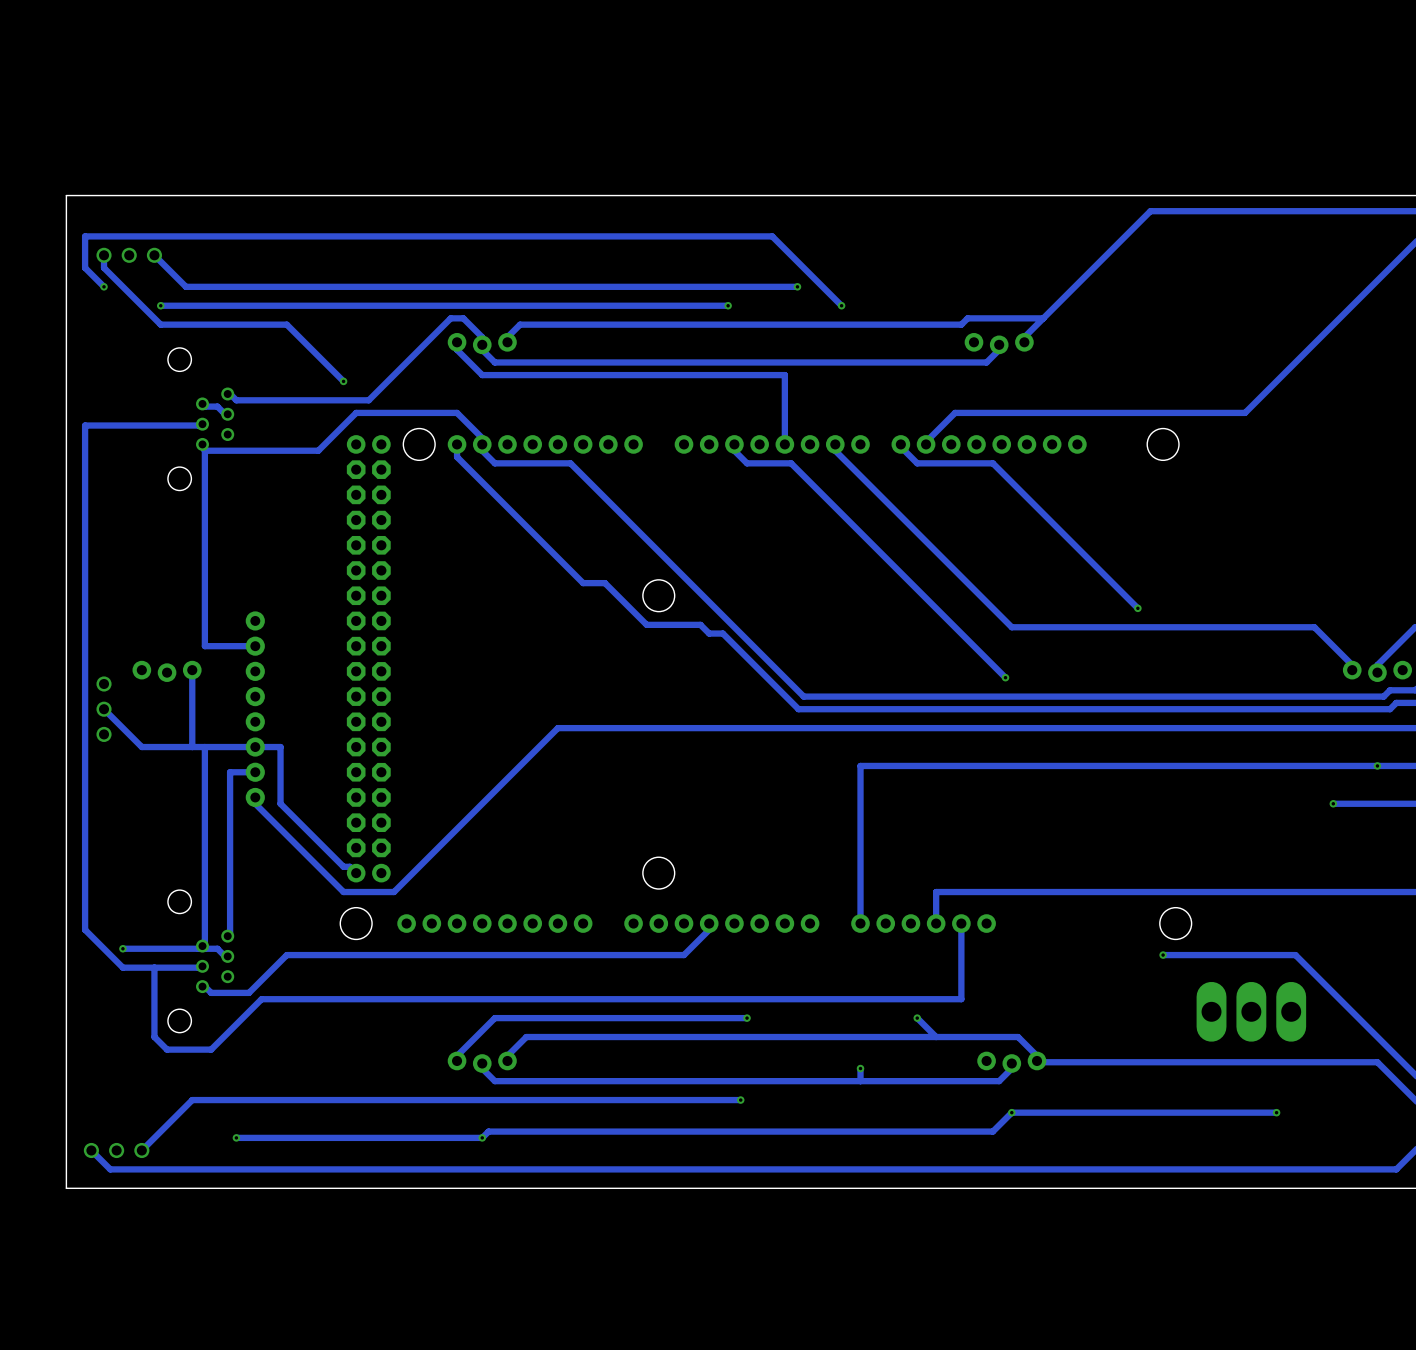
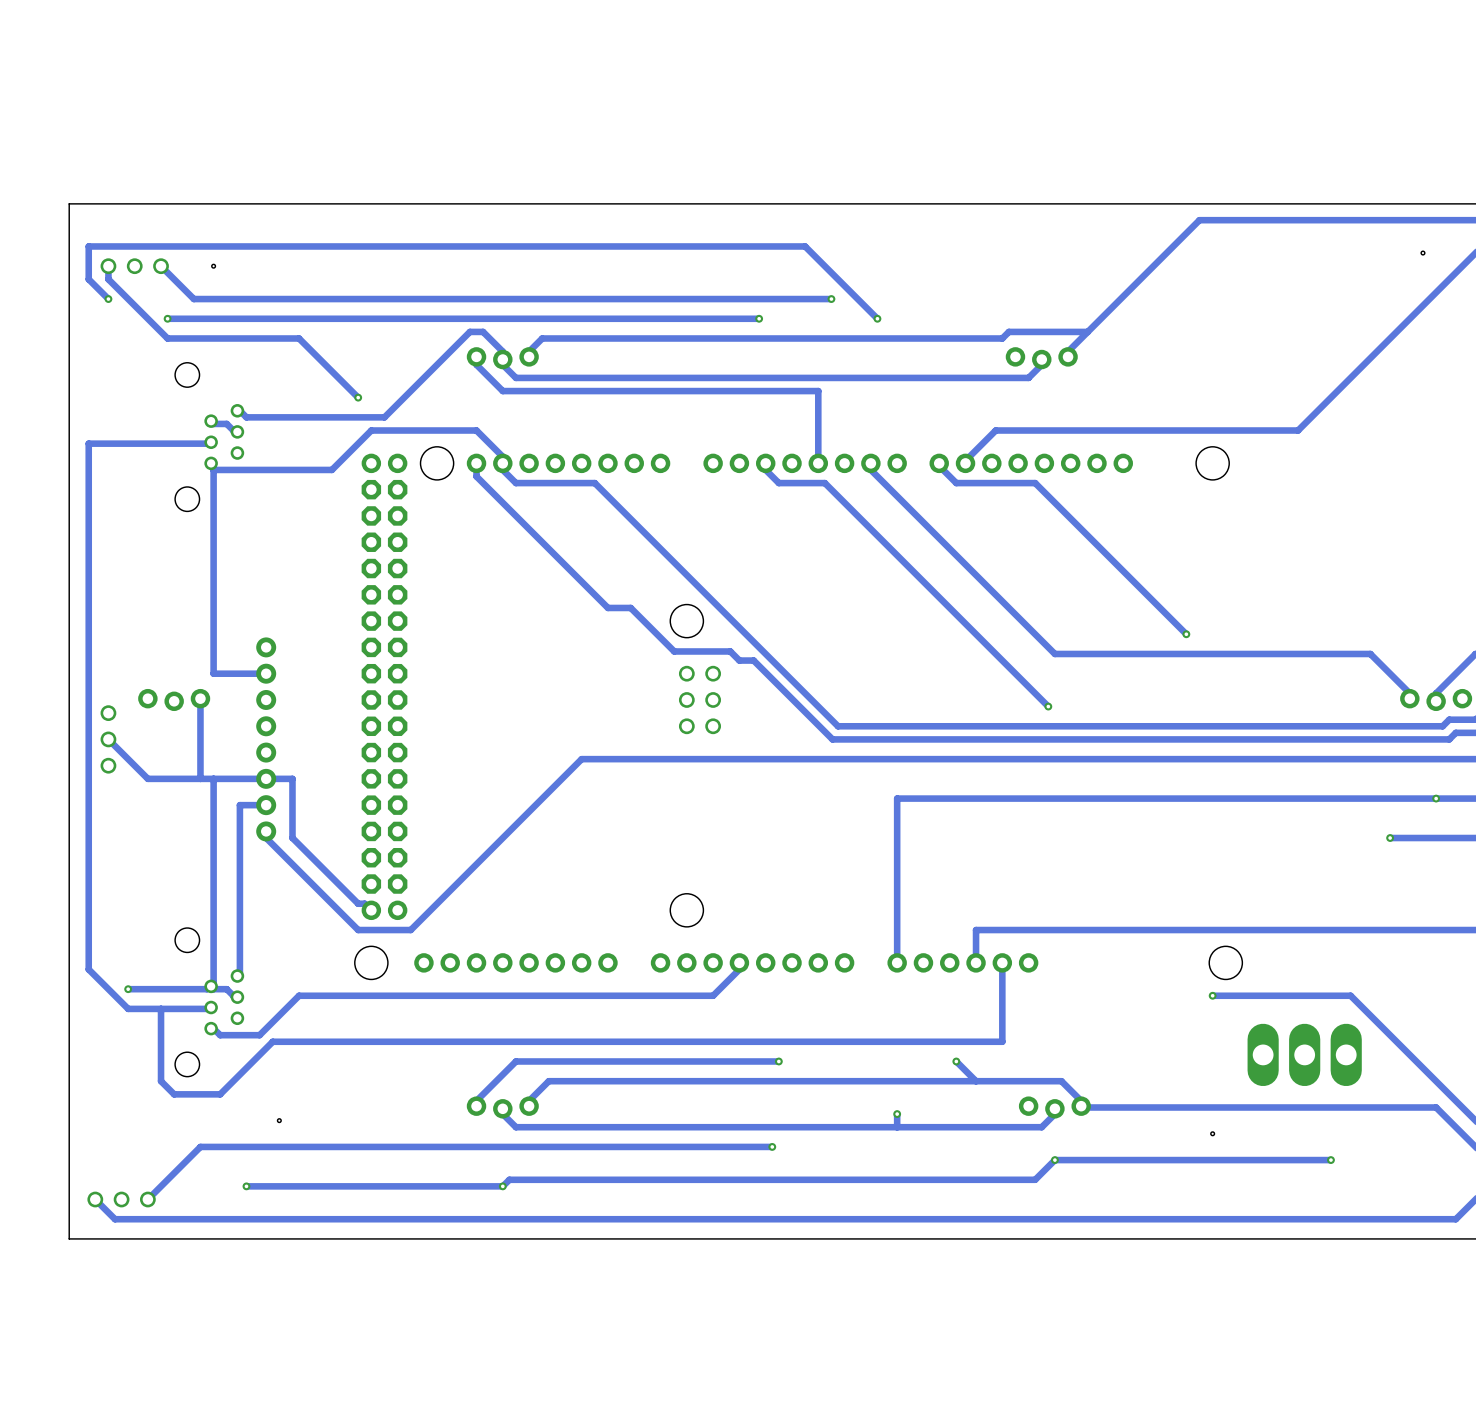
hole: none -> (1422, 253)
hole: none -> (213, 266)
part: none -> (686, 699)
part: none -> (713, 699)
hole: none -> (279, 1120)
hole: none -> (1212, 1133)

